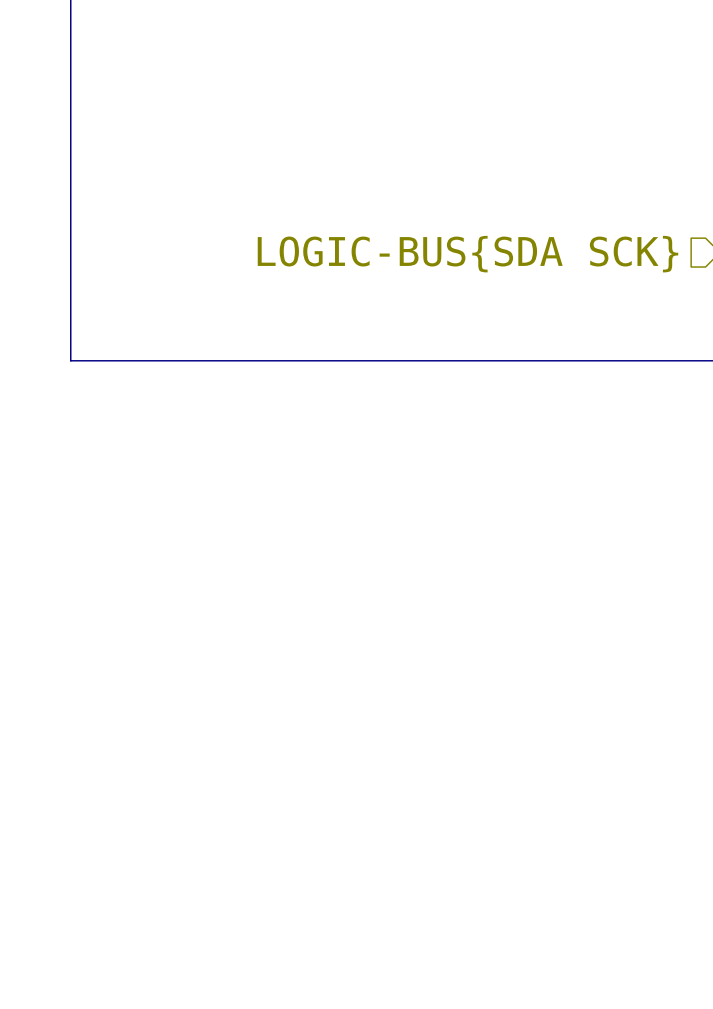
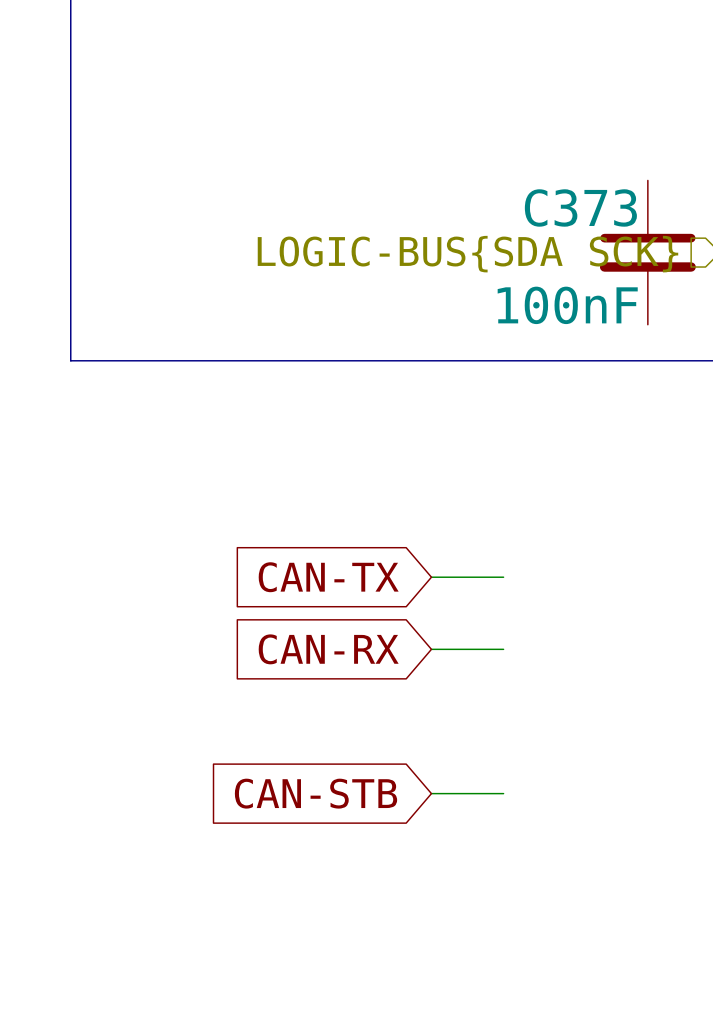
C373: none -> 100nF (647, 252)
global label: none -> CAN-TX (328, 577)
wire: none -> (431, 577) (503, 577)
global label: none -> CAN-RX (328, 649)
wire: none -> (431, 649) (503, 649)
global label: none -> CAN-STB (316, 793)
wire: none -> (431, 793) (503, 793)

